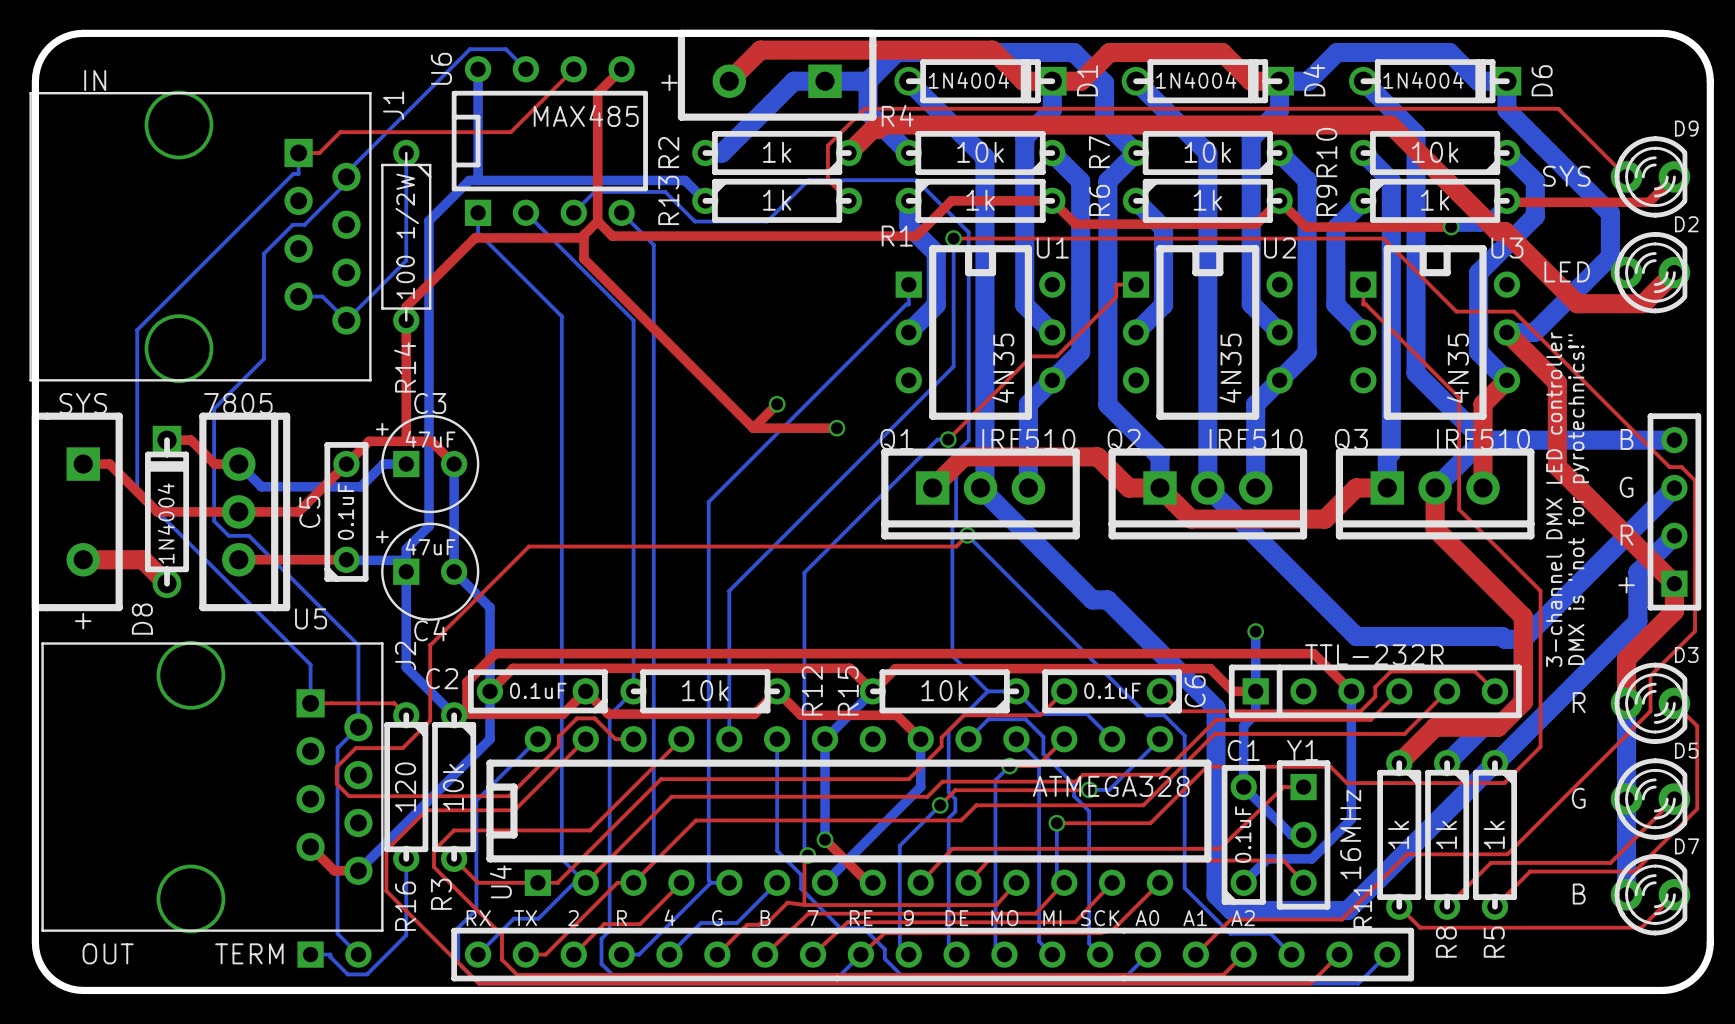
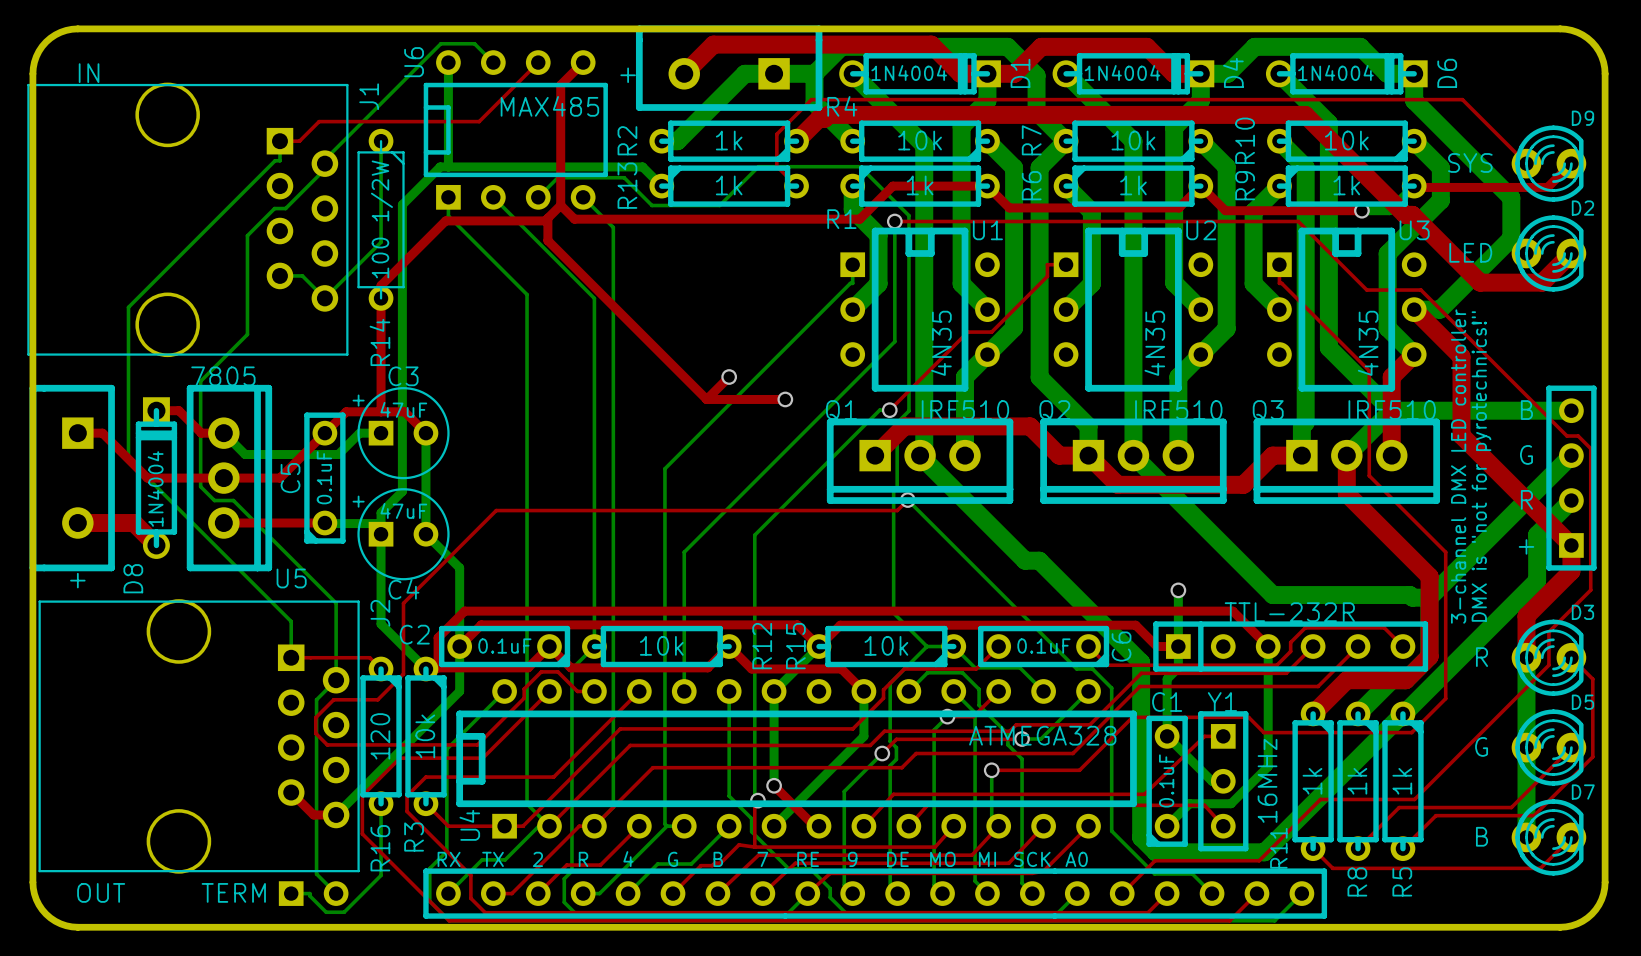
part value: SYS (83, 403) -> none
text: A1 (1195, 918) -> none
text: A2 (1243, 918) -> none

